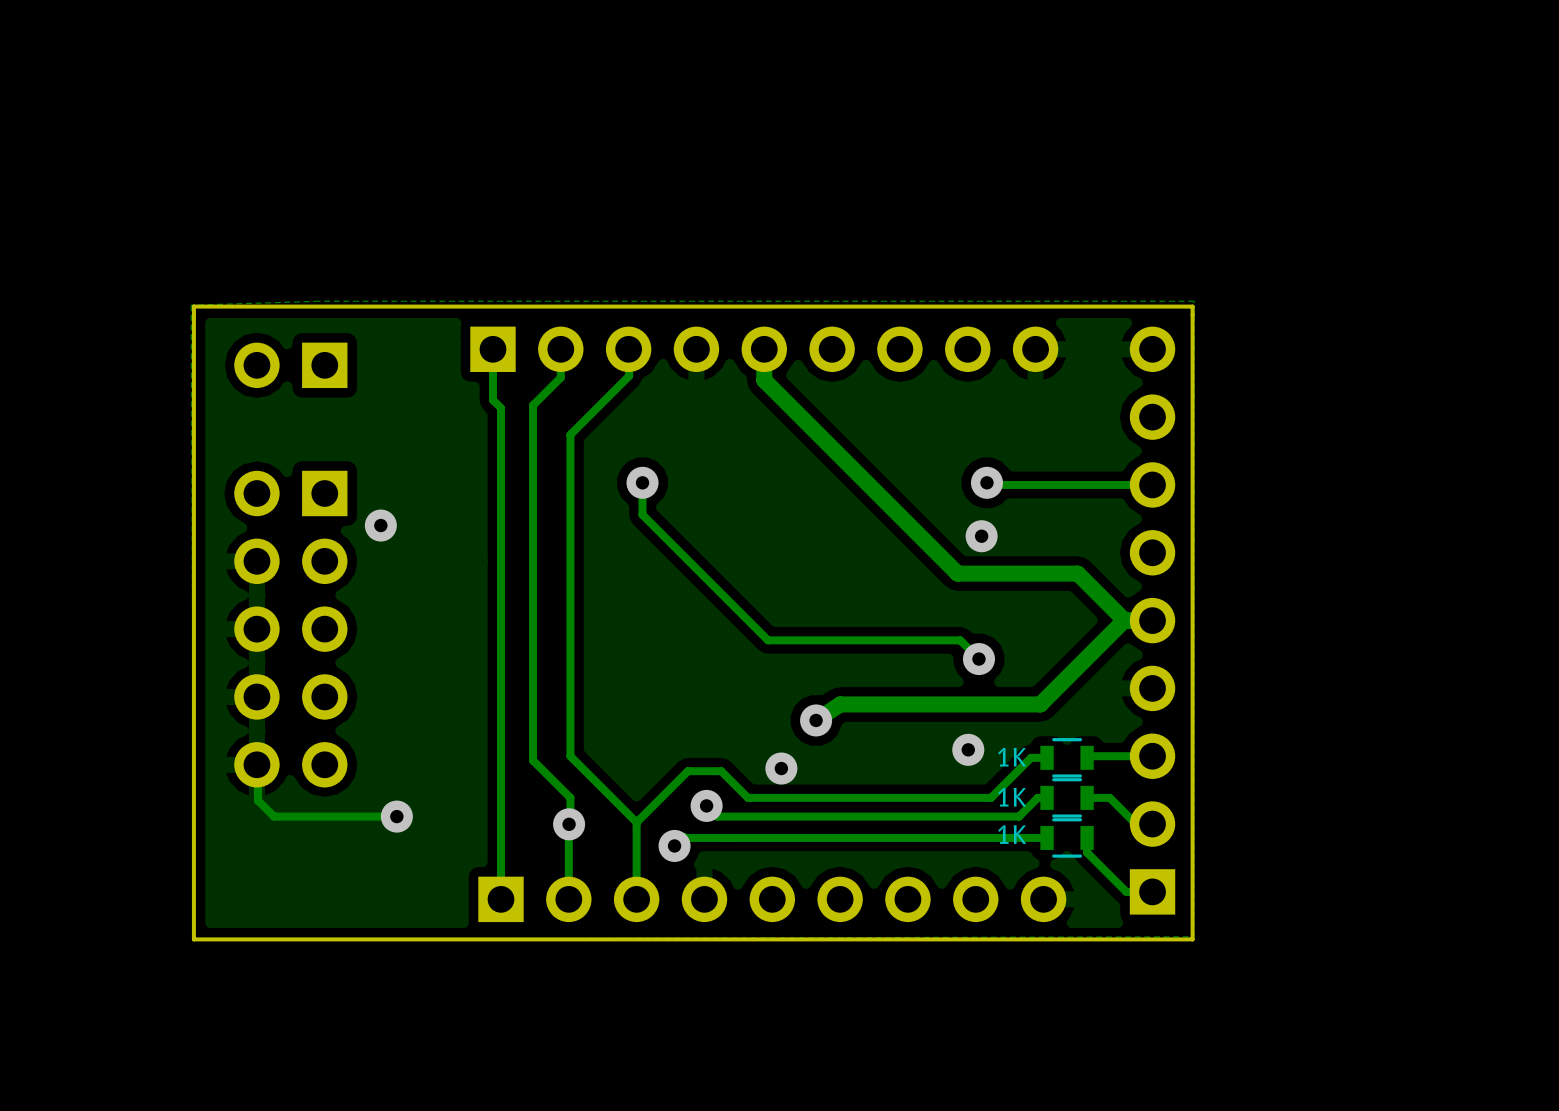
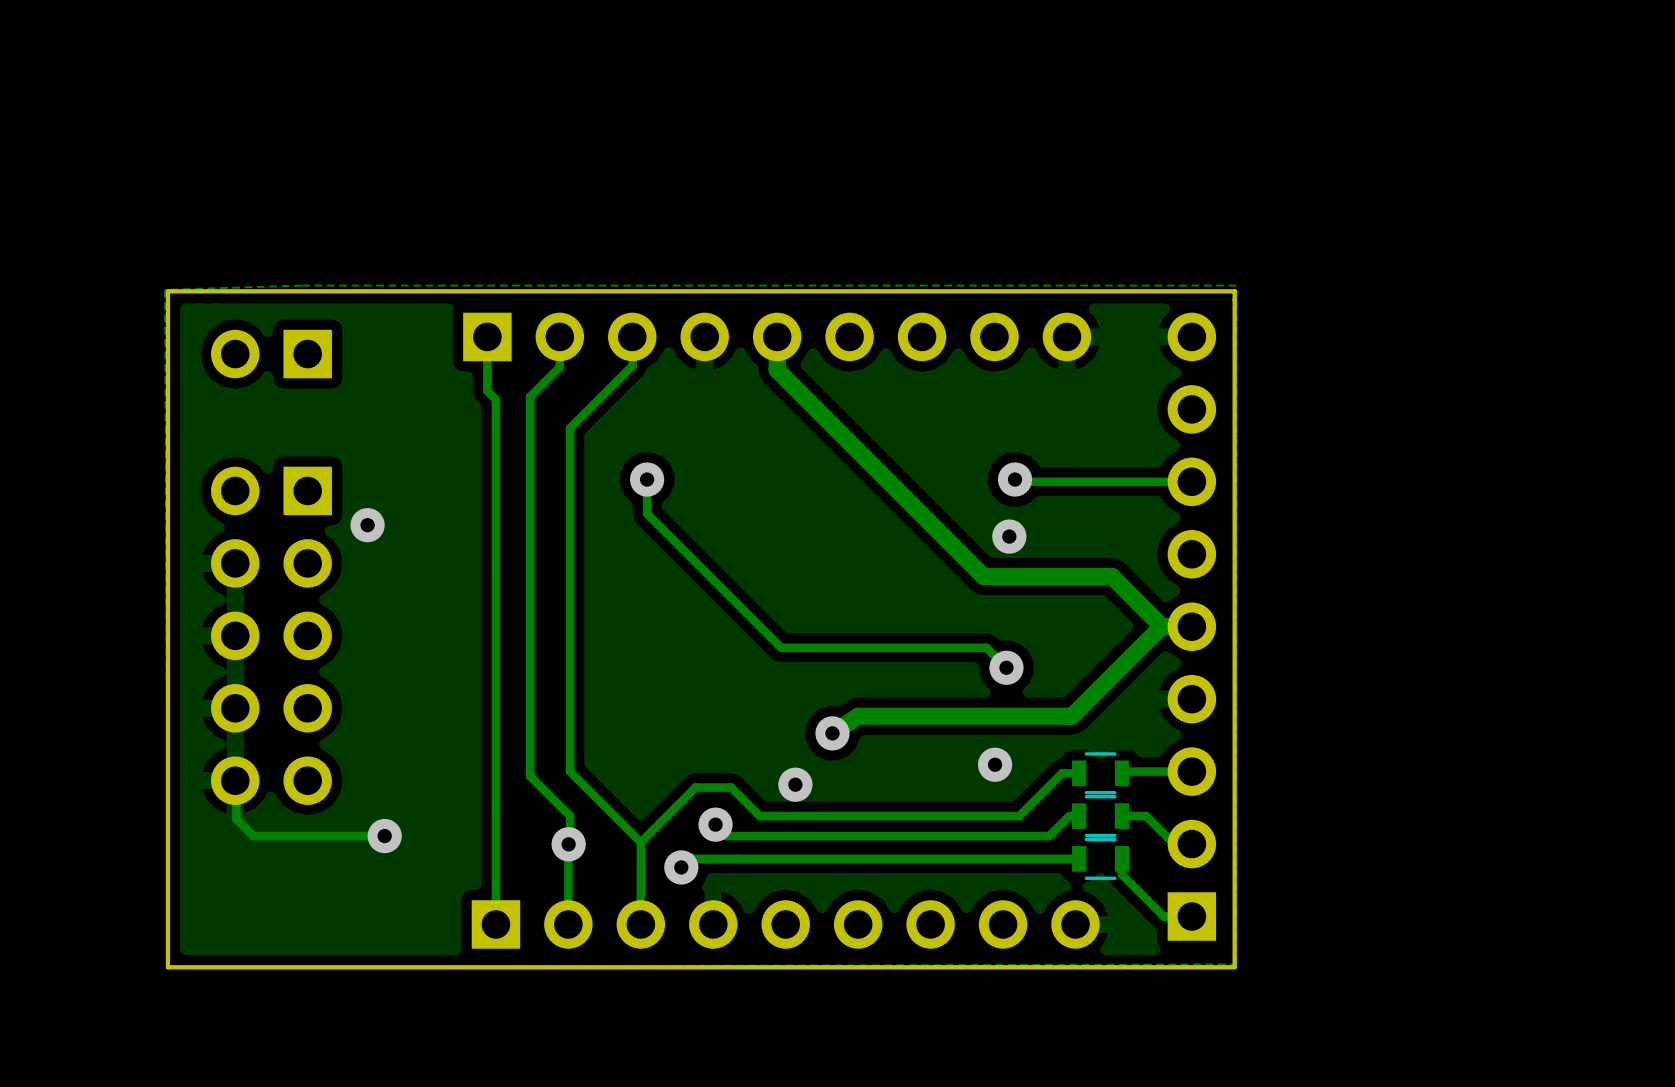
text: 1K (1012, 757) -> none
text: 1K (1012, 797) -> none
text: 1K (1012, 834) -> none

